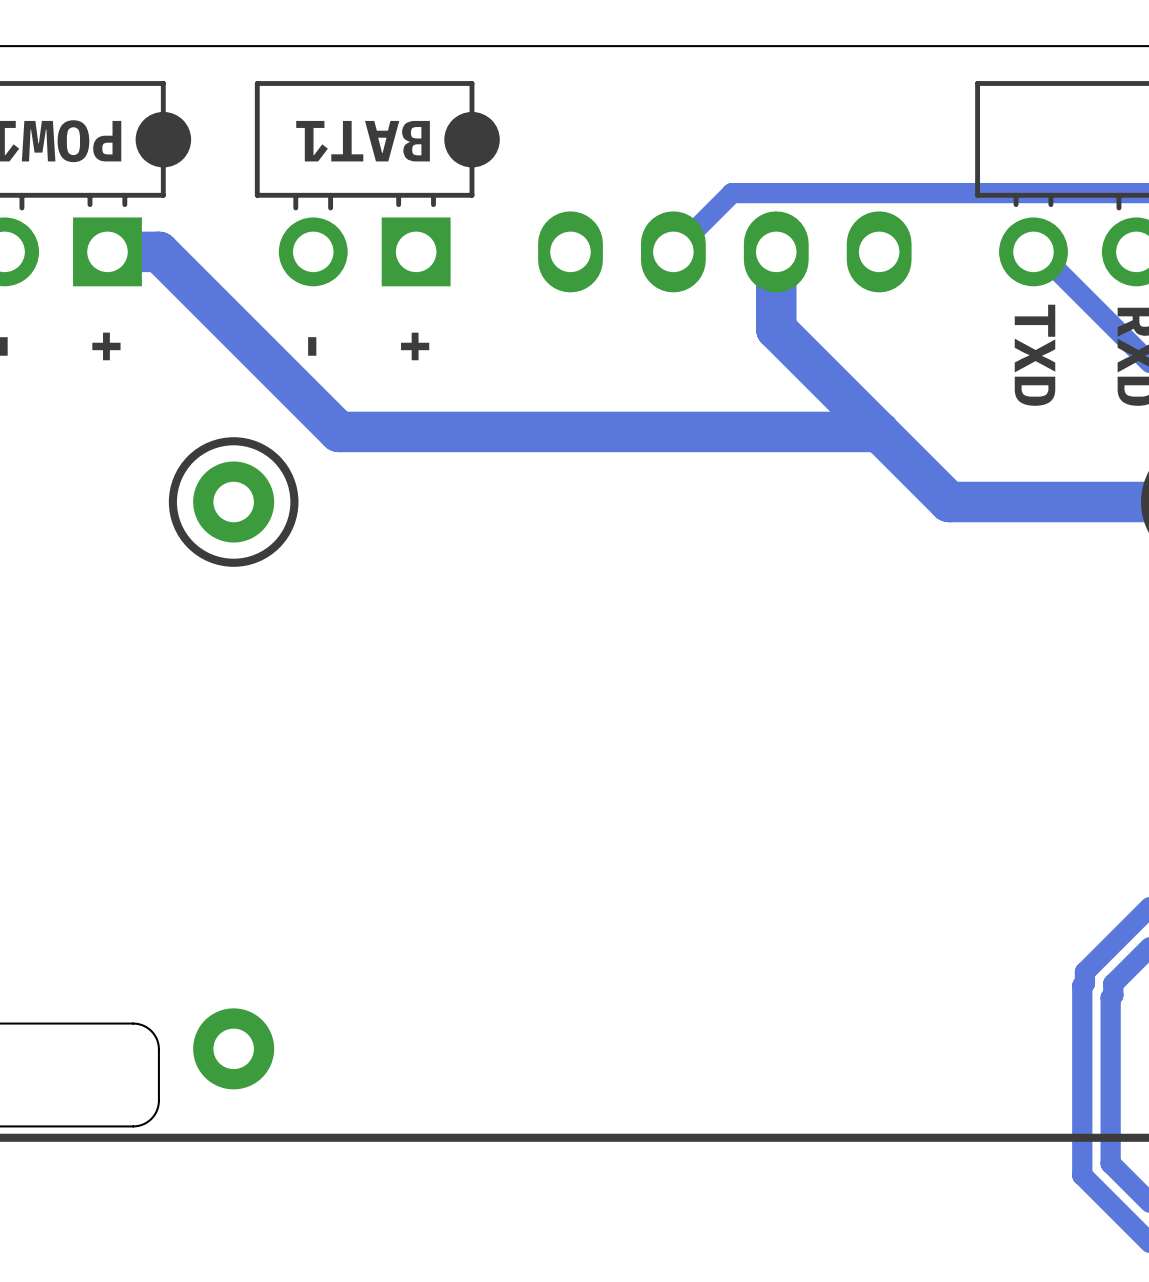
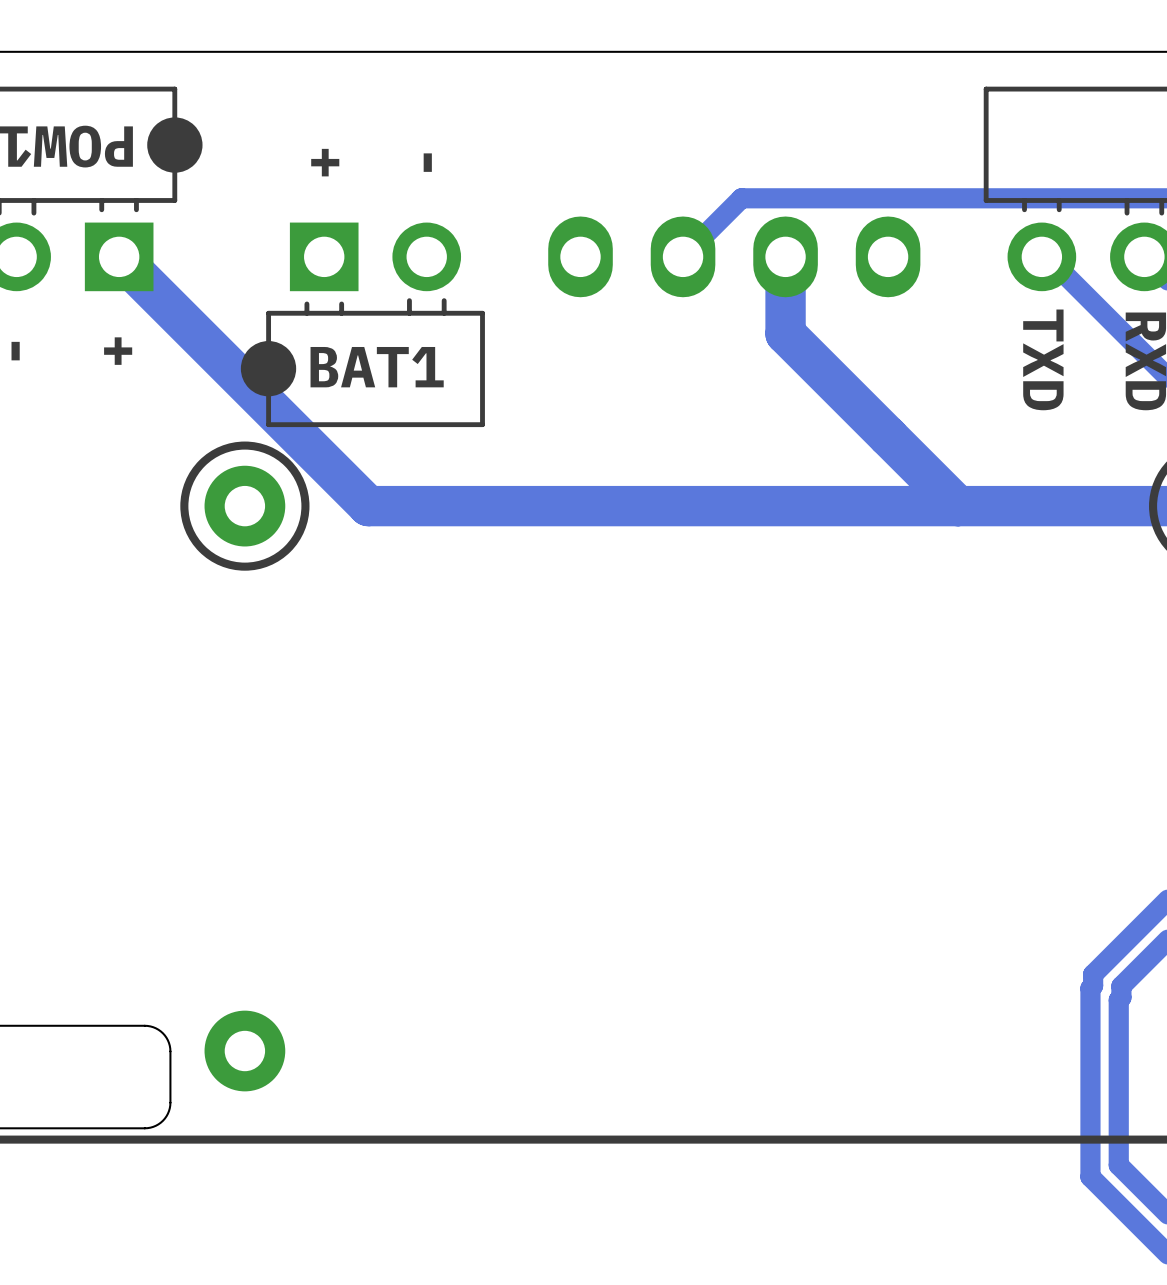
BAT1 rotation: 0° (377, 183) -> 180° (362, 324)
track: (107, 251) (158, 251) (338, 431) (879, 431) -> (119, 256) (368, 506) (957, 506)

